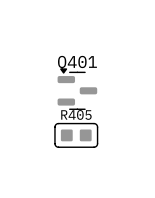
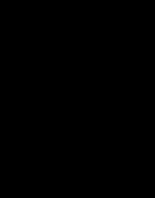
Q401: (77, 89) -> none
R405: (76, 135) -> none

